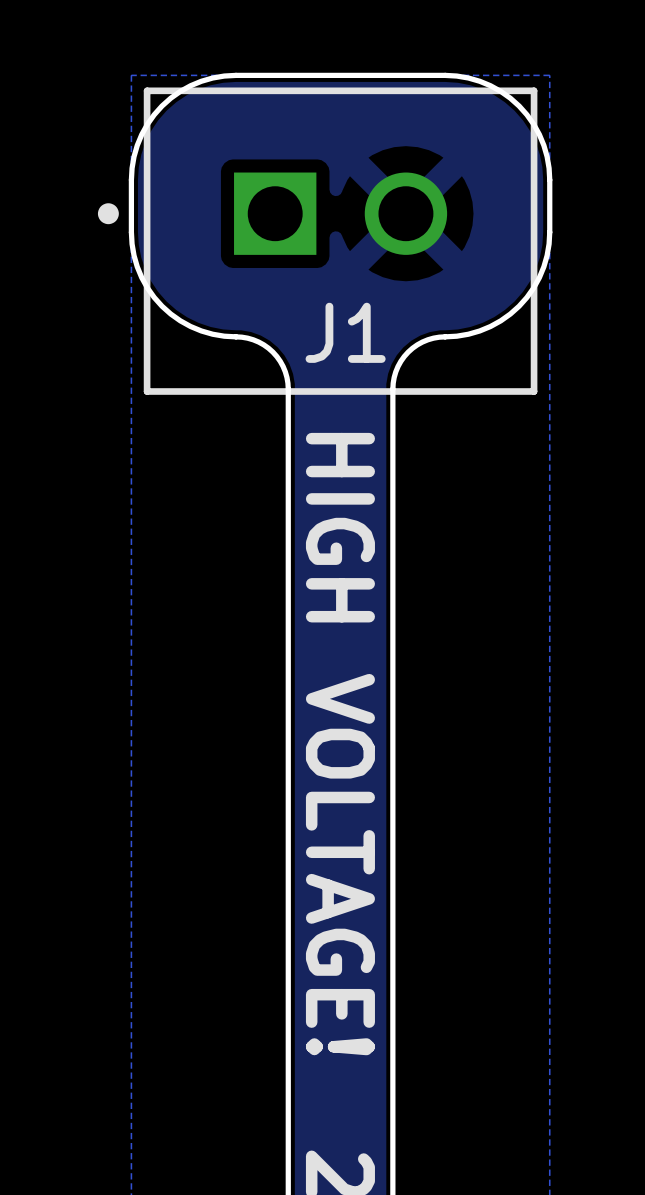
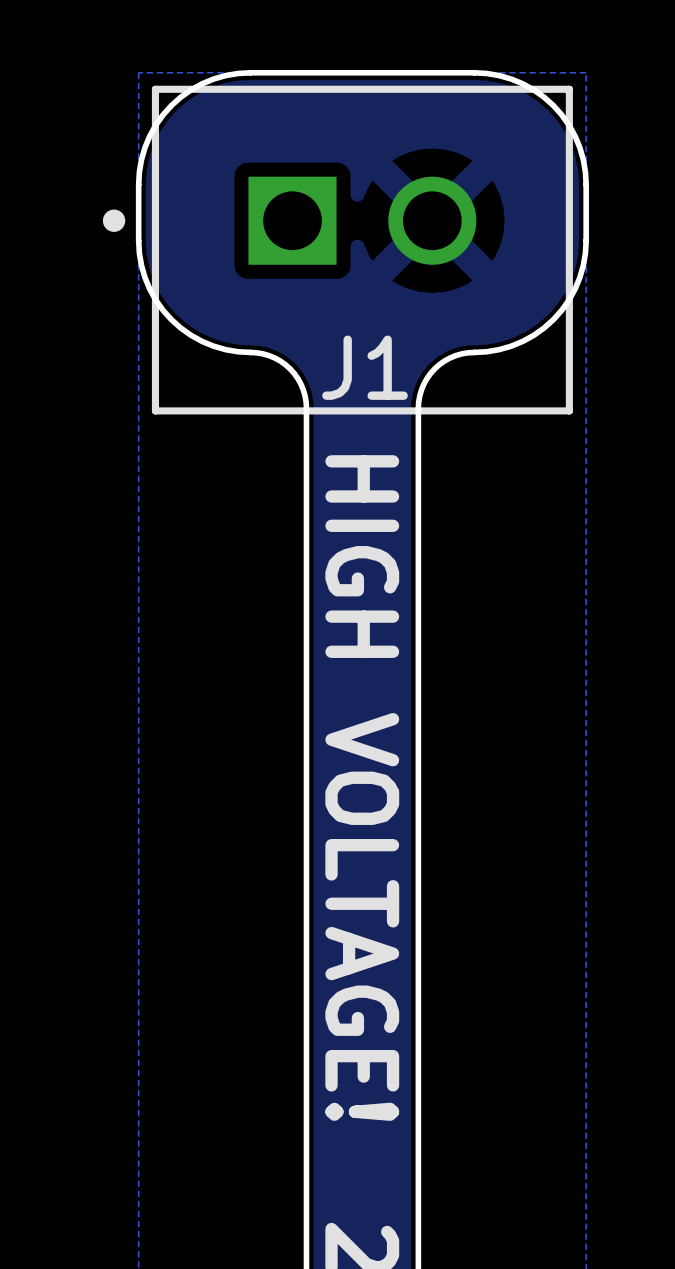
J1 name position: J1 (345, 332) -> J1 (365, 367)

